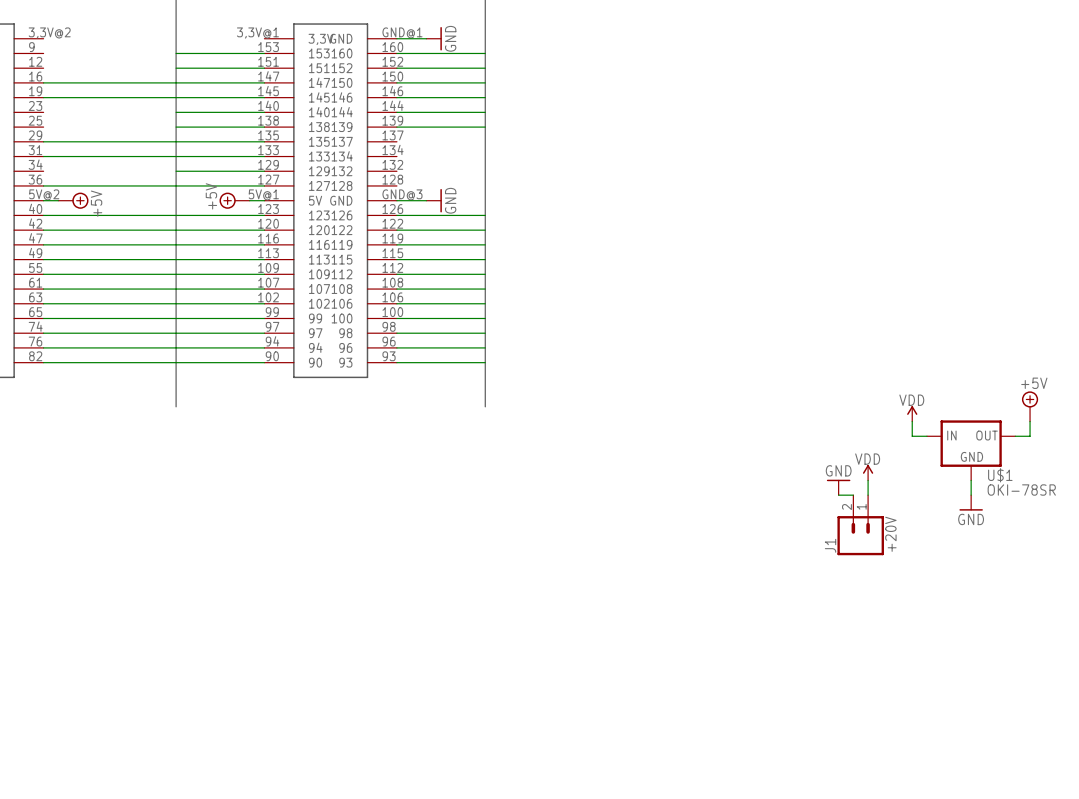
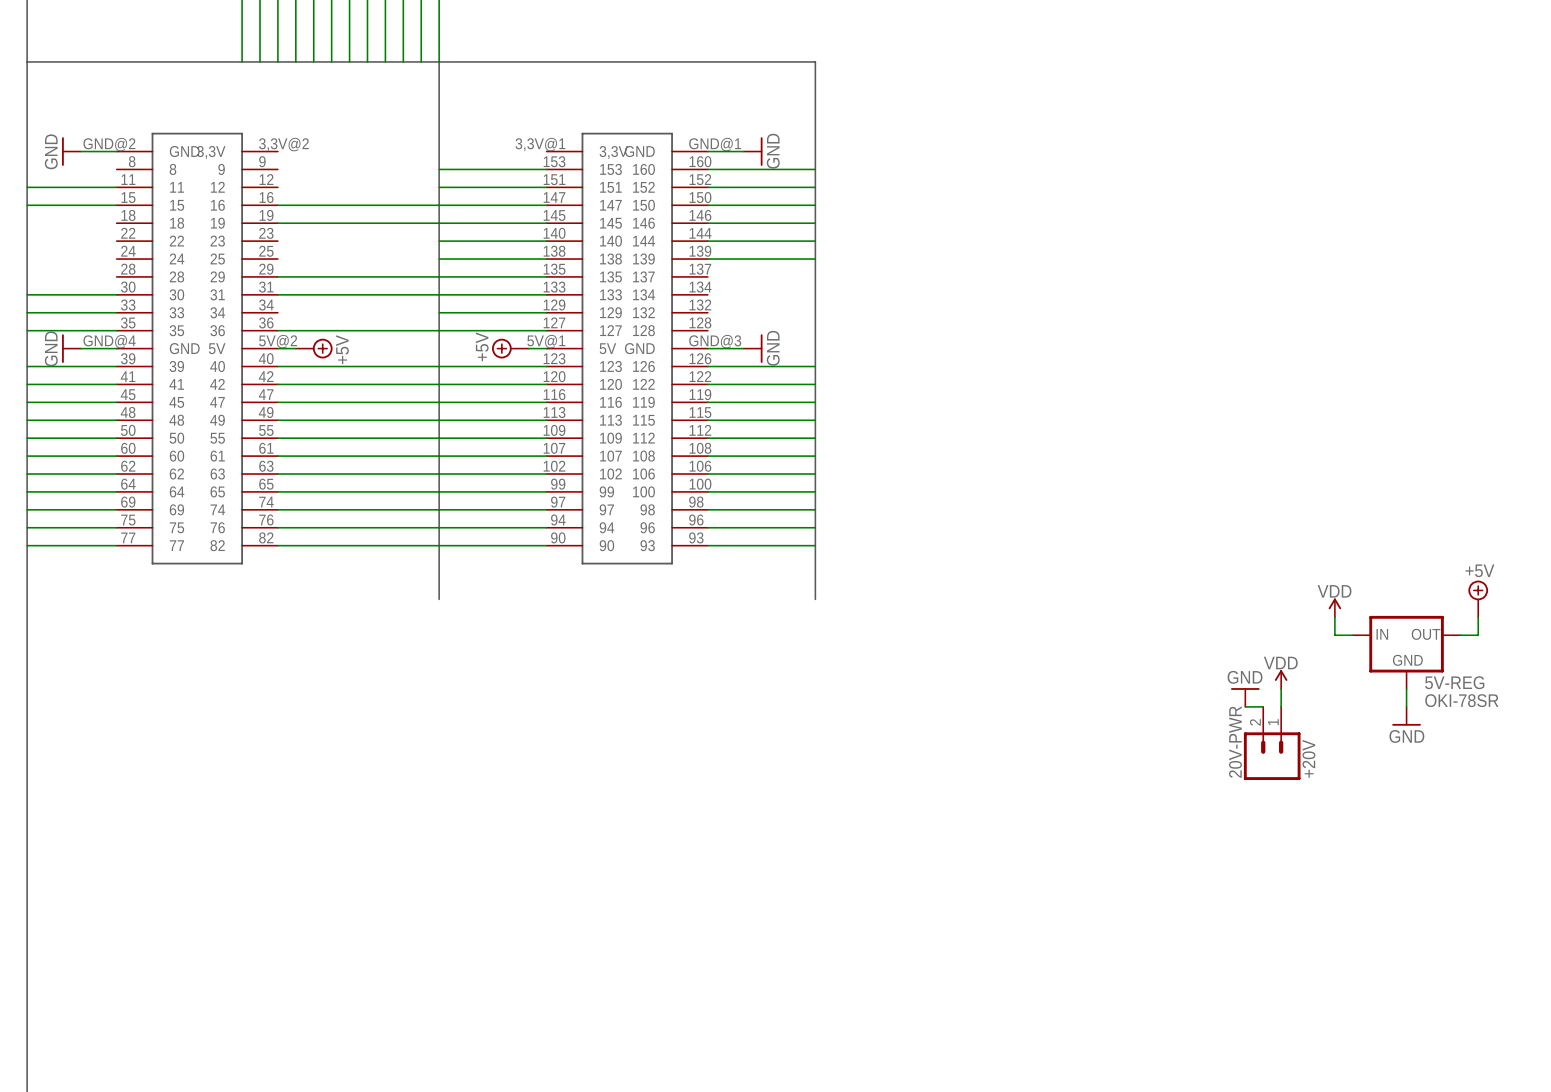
U$1 name: U$1 (1000, 475) -> 5V-REG (1454, 682)
J1 name: J1 (830, 545) -> 20V-PWR (1235, 742)

